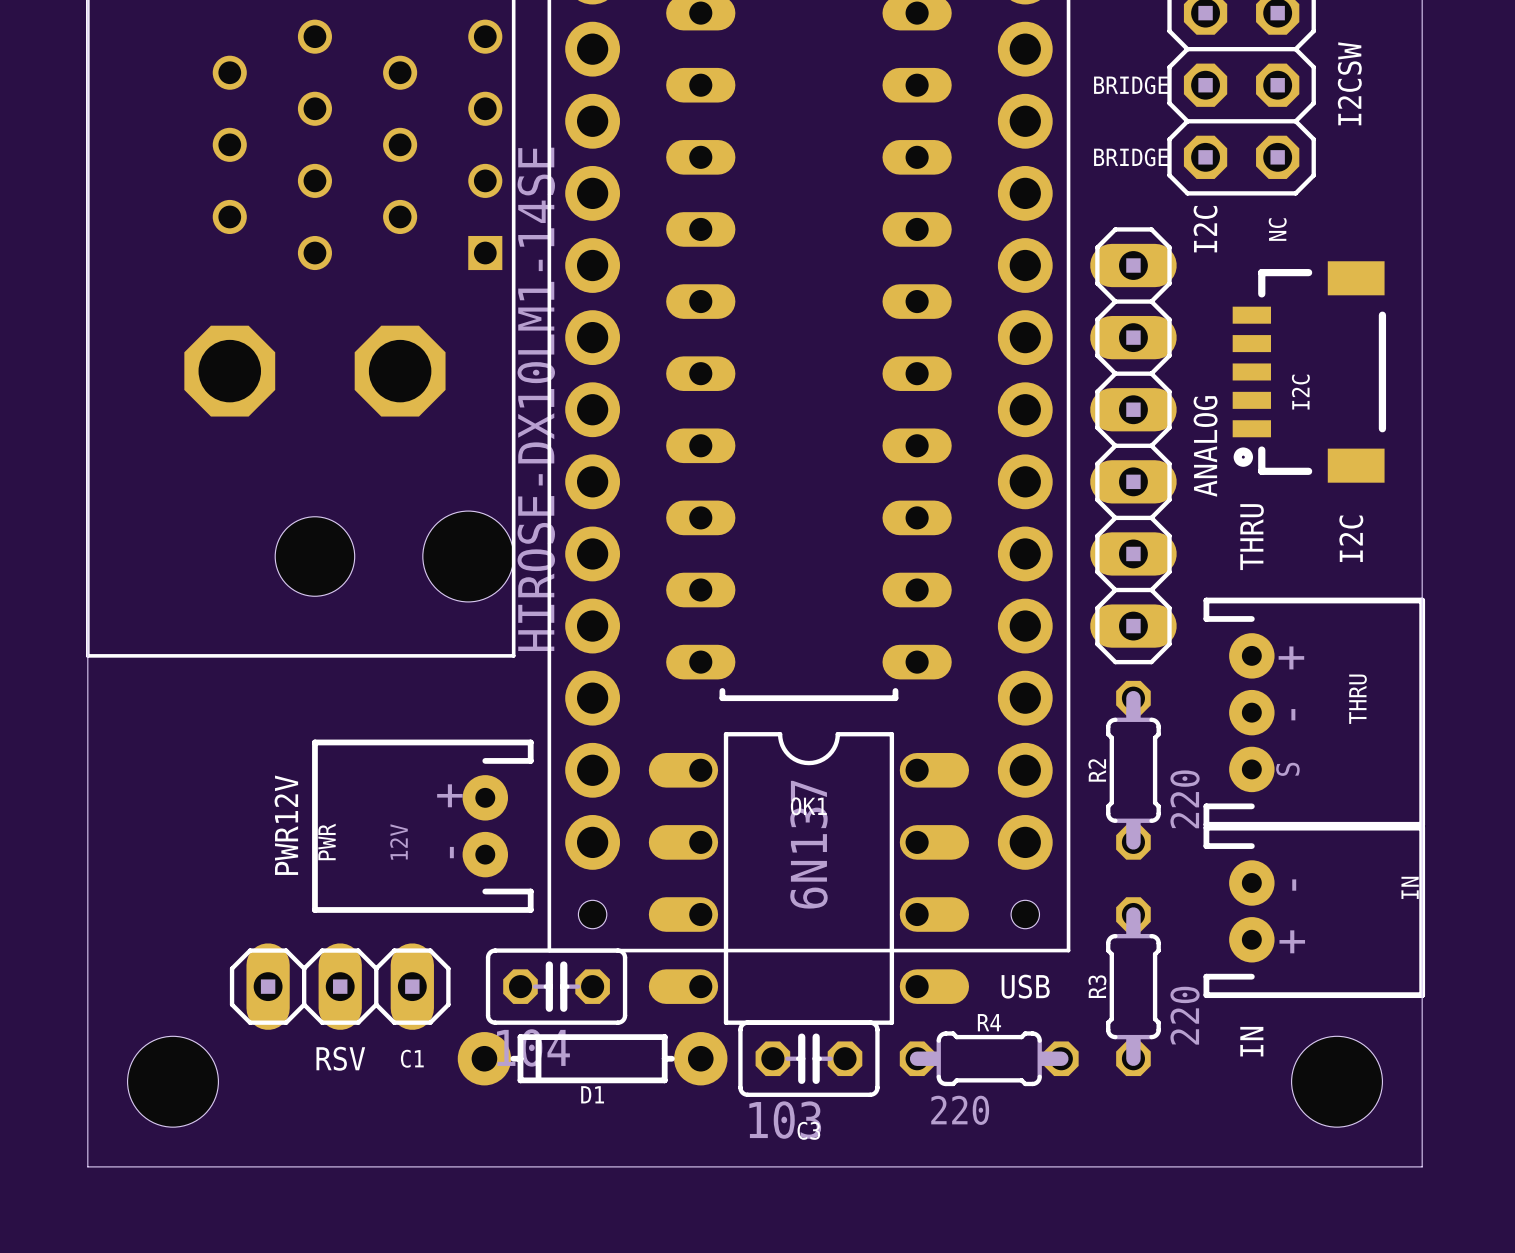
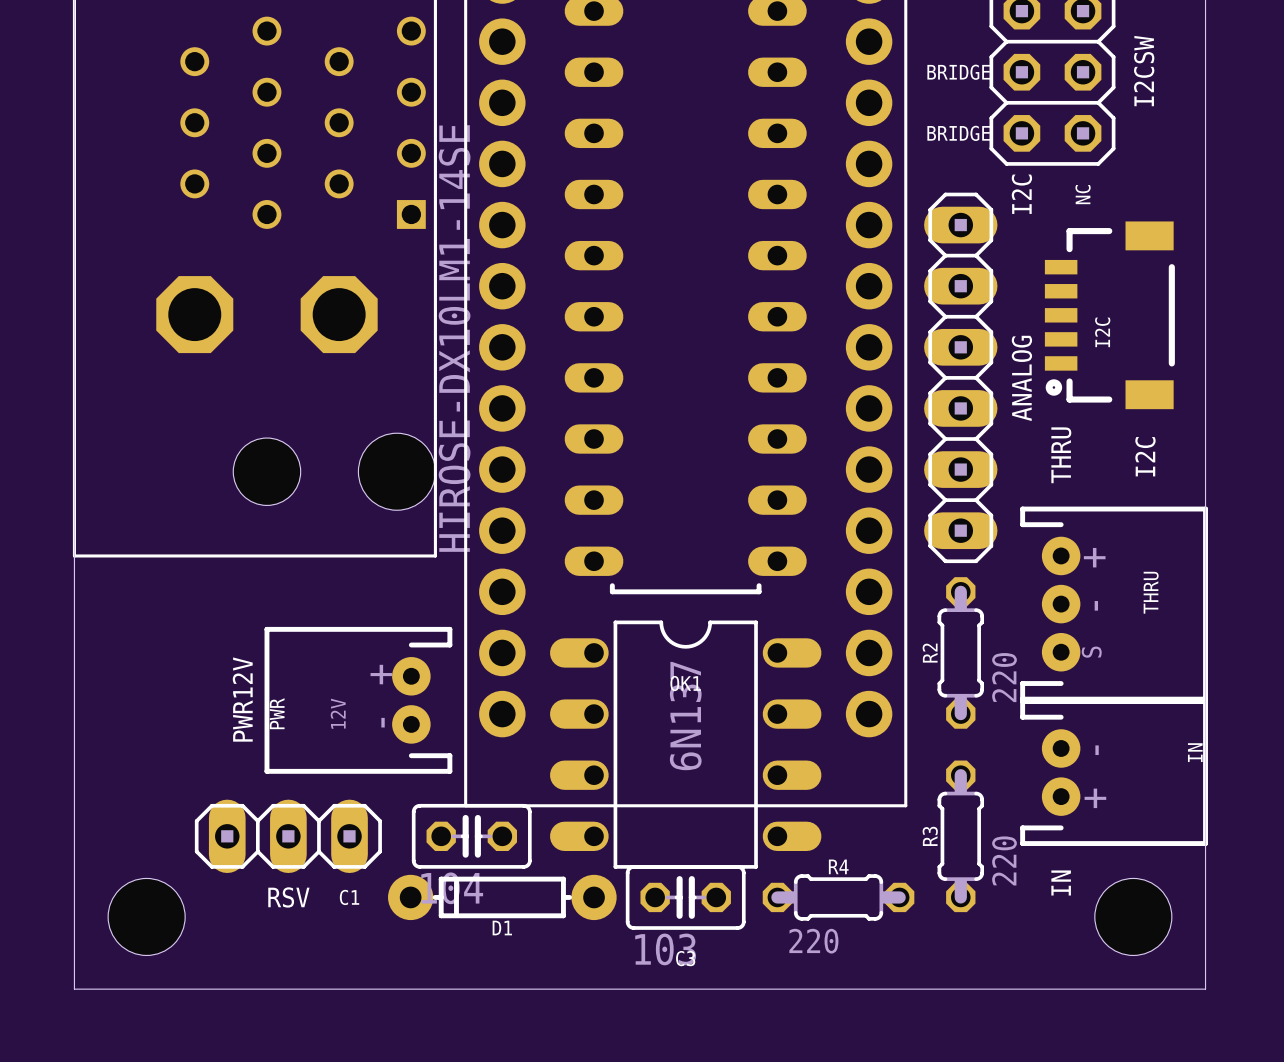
hole: (592, 914) -> none
hole: (1025, 914) -> none
text: USB (1025, 986) -> none

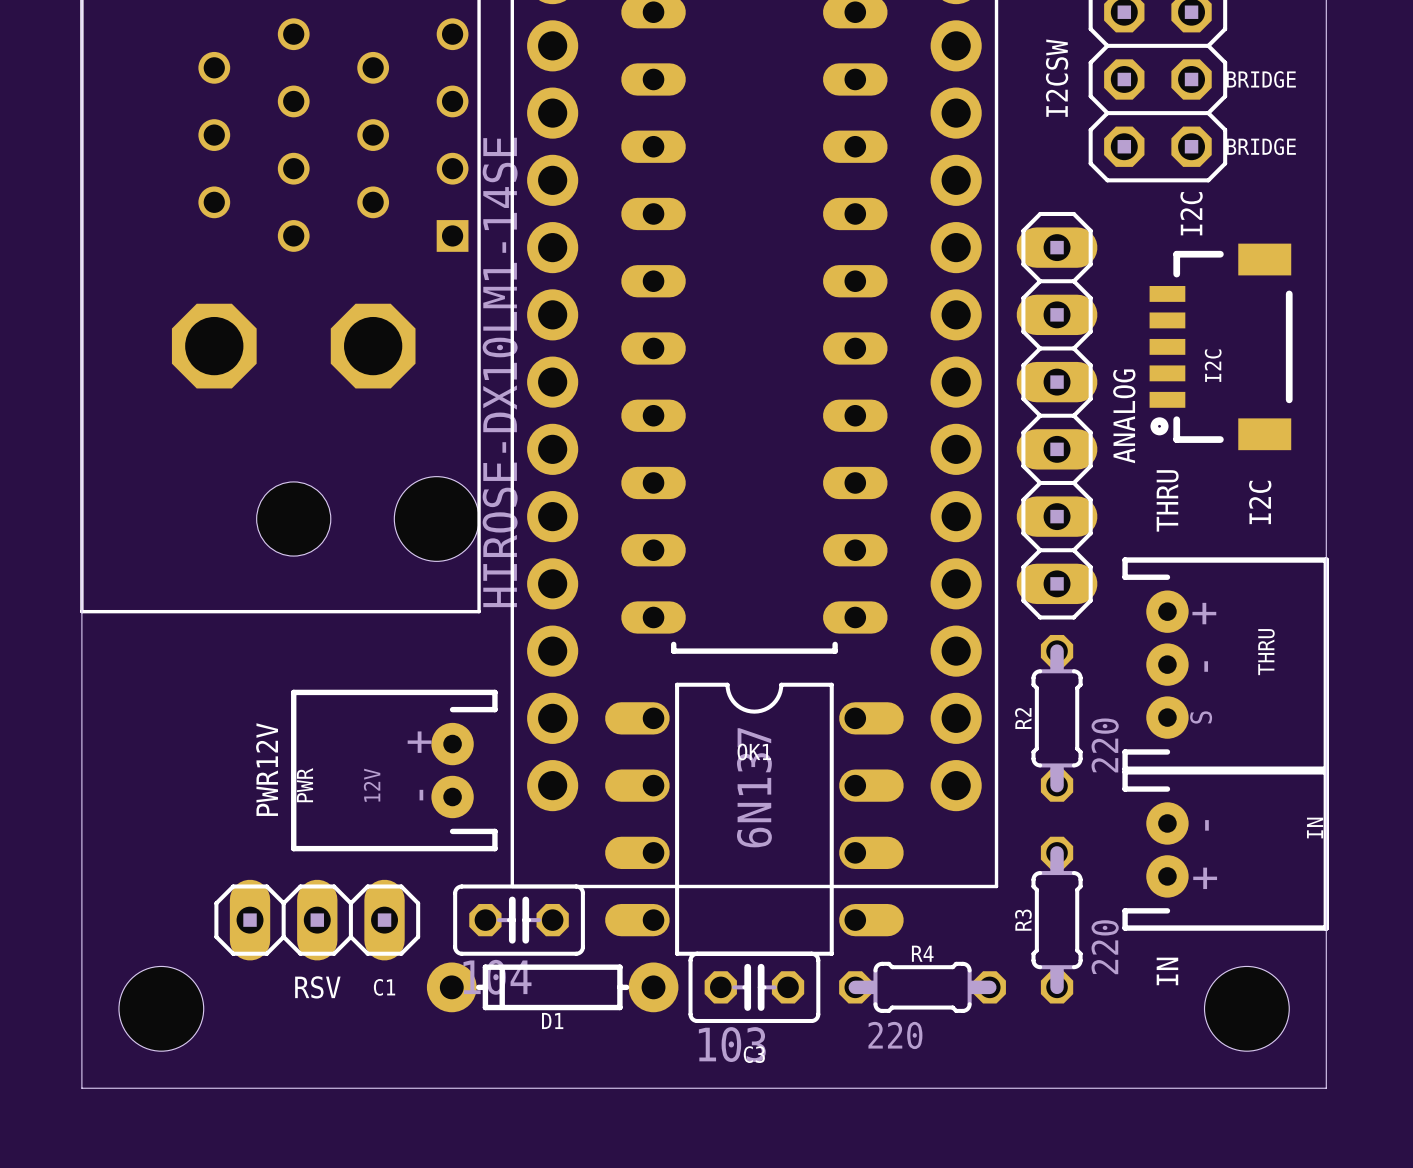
I2CSW name position: I2CSW (1144, 71) -> I2CSW (1057, 78)
text: BRIDGE (958, 72) -> none
text: none -> BRIDGE (1261, 79)
text: BRIDGE (958, 133) -> none
text: none -> BRIDGE (1261, 146)
text: I2C (1021, 194) -> none
text: NC (1083, 194) -> I2C (1191, 213)

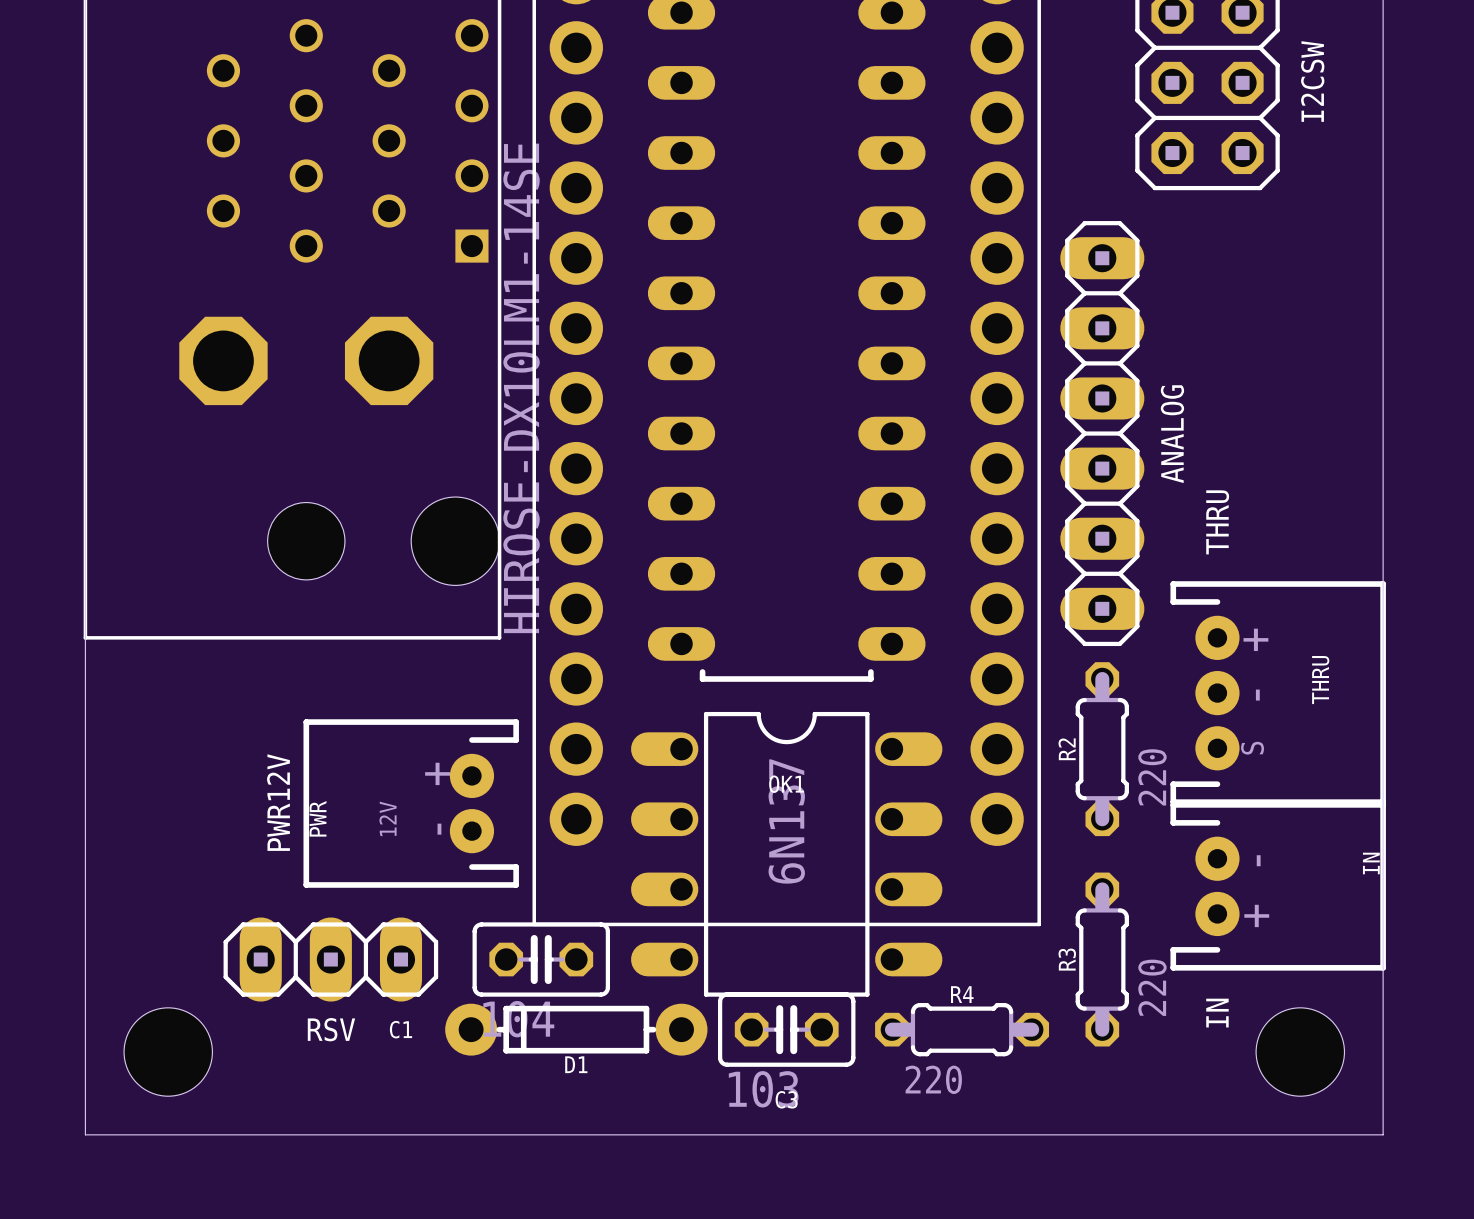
I2CSW name position: I2CSW (1057, 78) -> I2CSW (1312, 81)
text: BRIDGE (1261, 79) -> none
text: BRIDGE (1261, 146) -> none
text: I2C (1191, 213) -> none
I2C: (1221, 346) -> none
text: I2C (1260, 502) -> none

